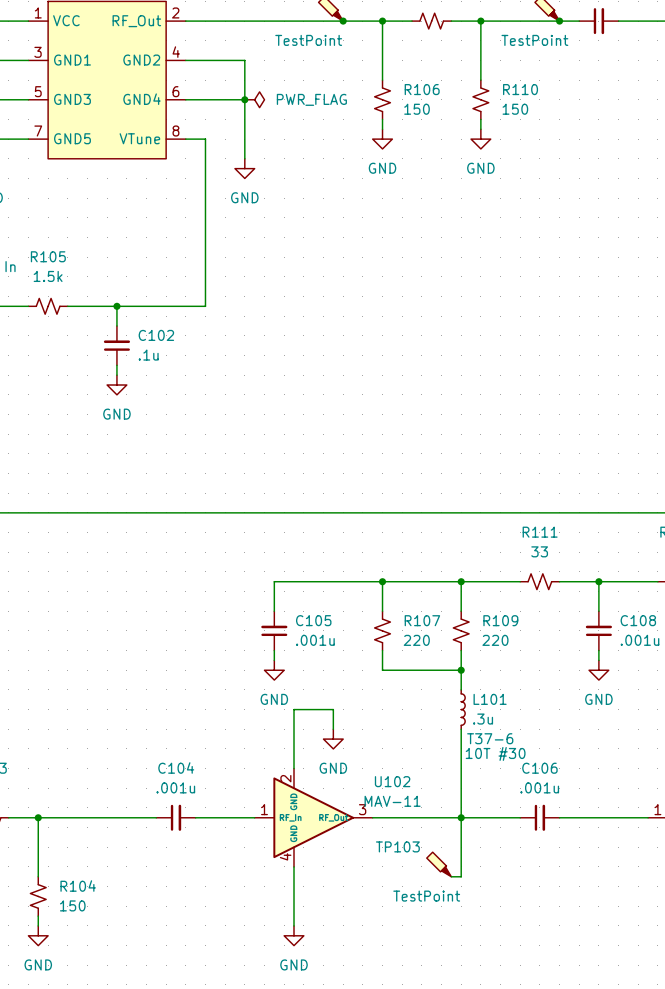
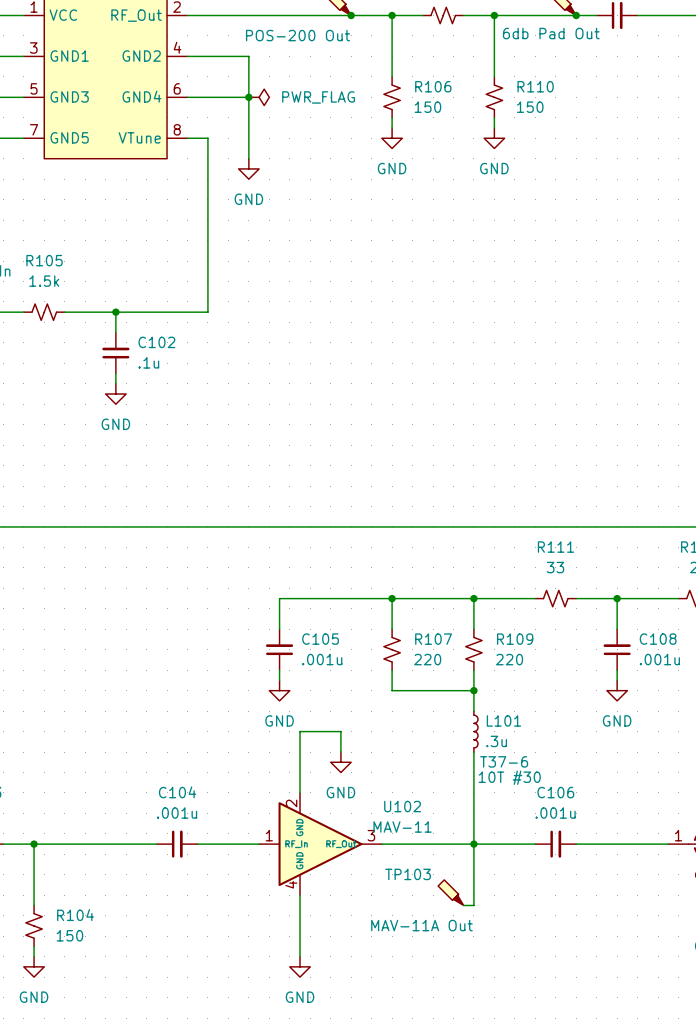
part value: TestPoint (308, 40) -> POS-200 Out (297, 35)
part value: TestPoint (534, 40) -> 6db Pad Out (551, 33)
TP103 value: TestPoint (426, 896) -> MAV-11A Out (421, 925)

